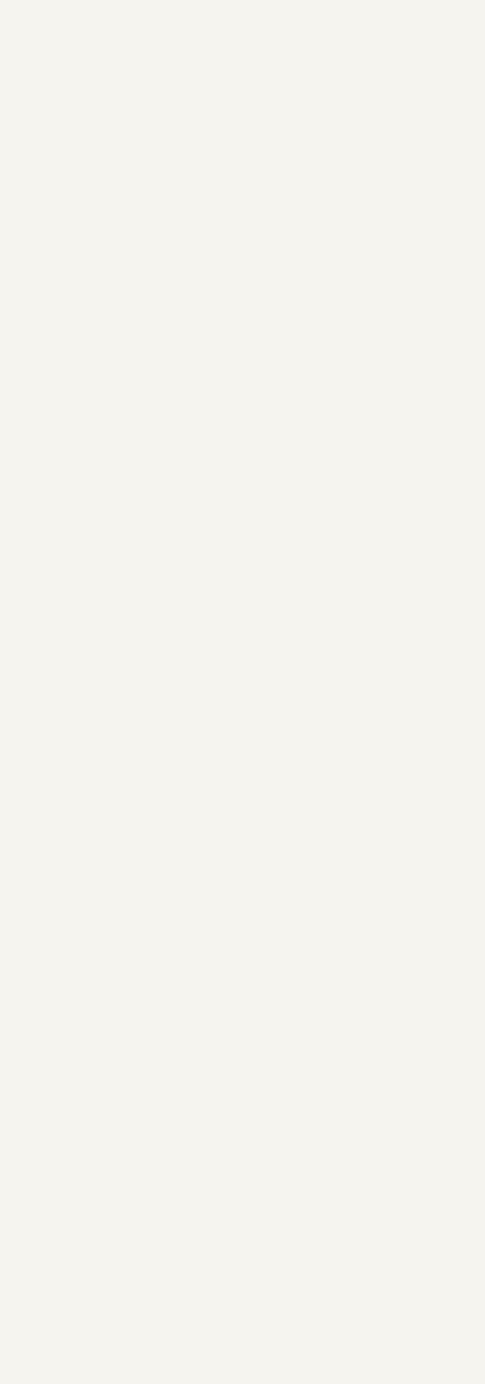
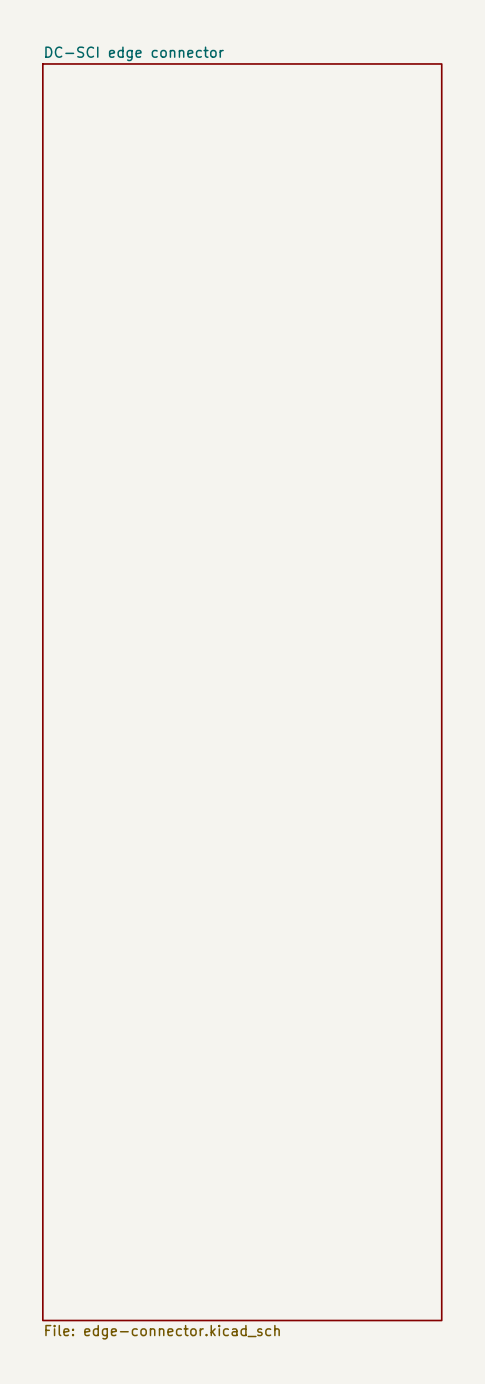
sheet DC-SCI edge connector: none -> File: edge-connector.kicad_sch (242, 692)

